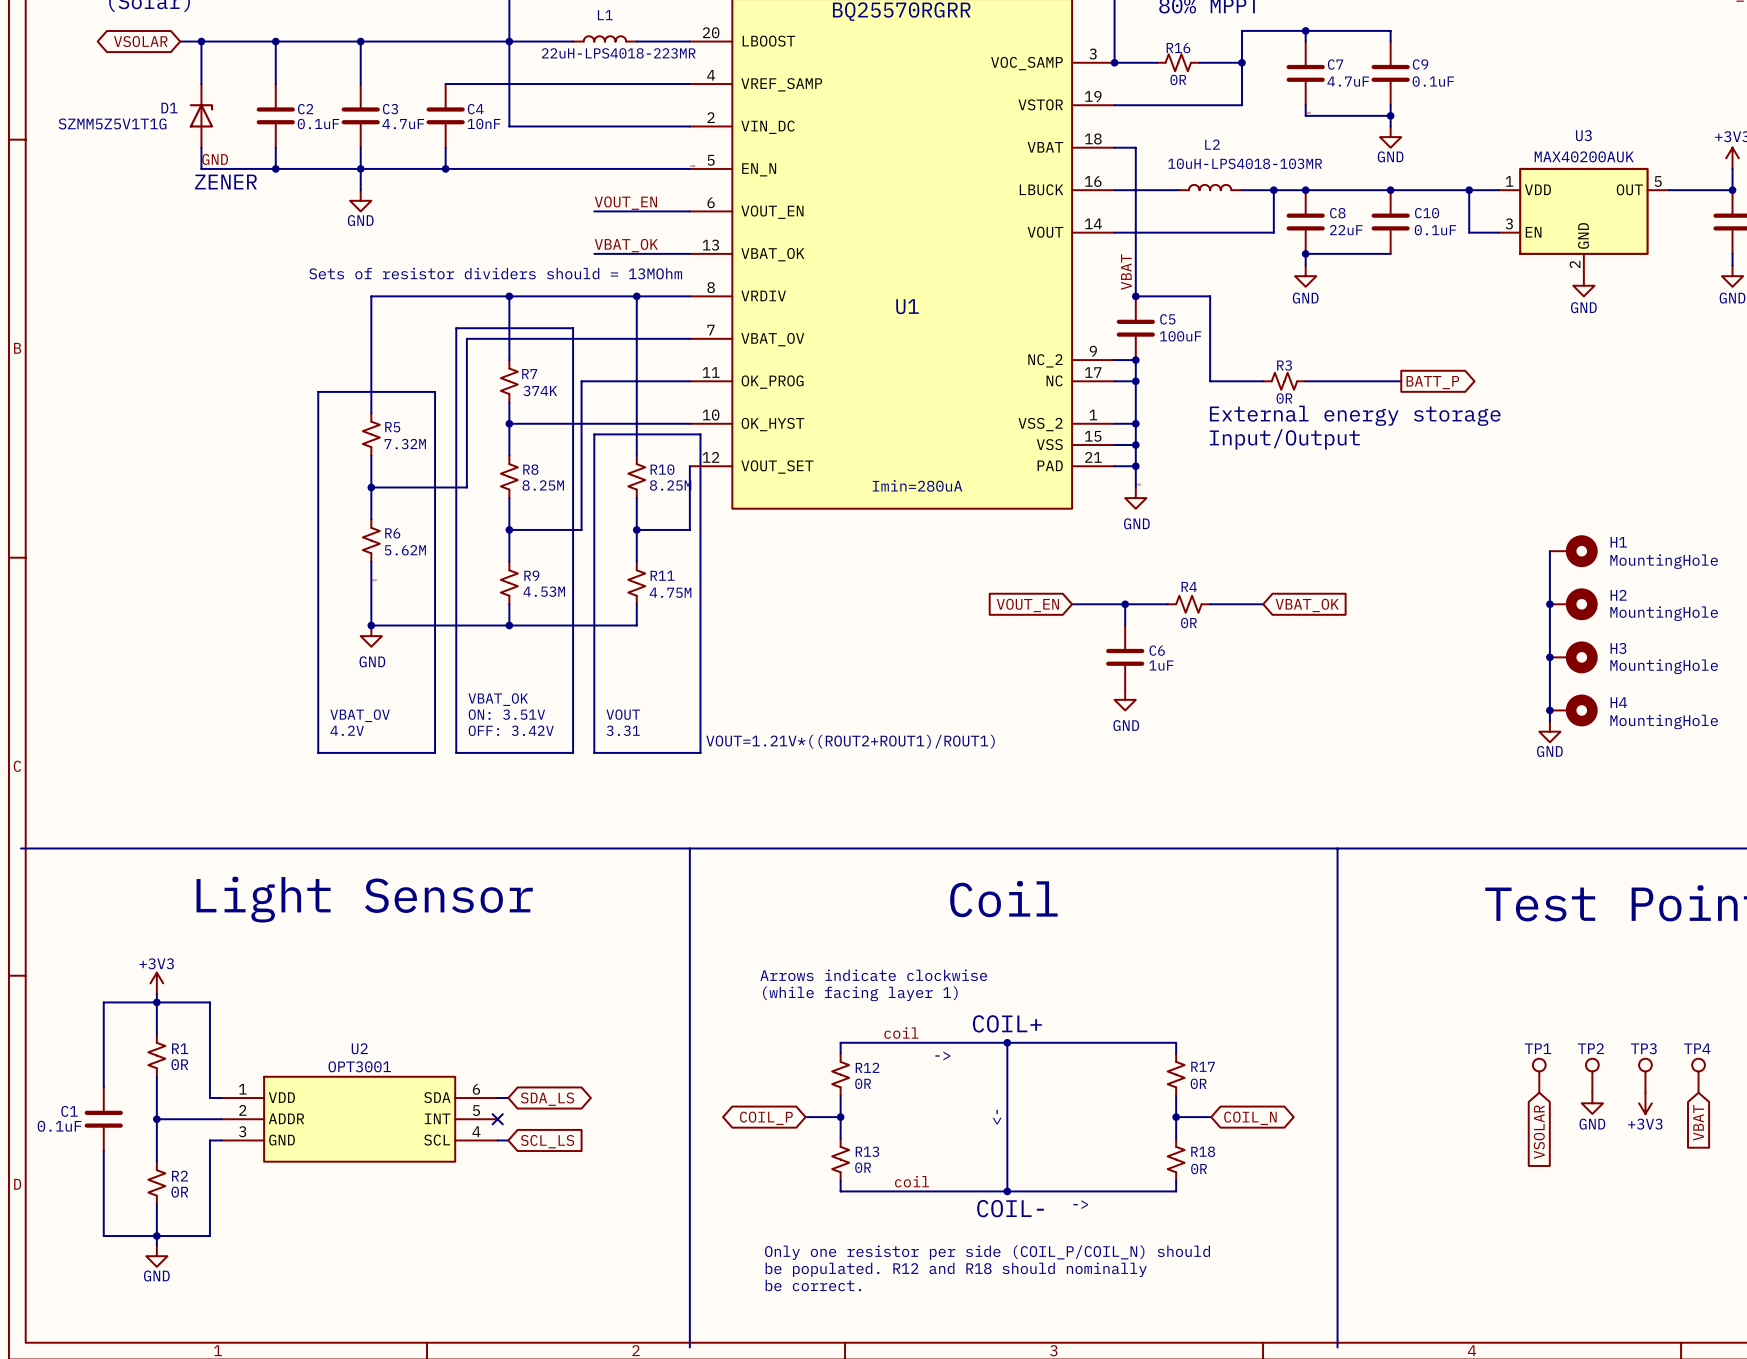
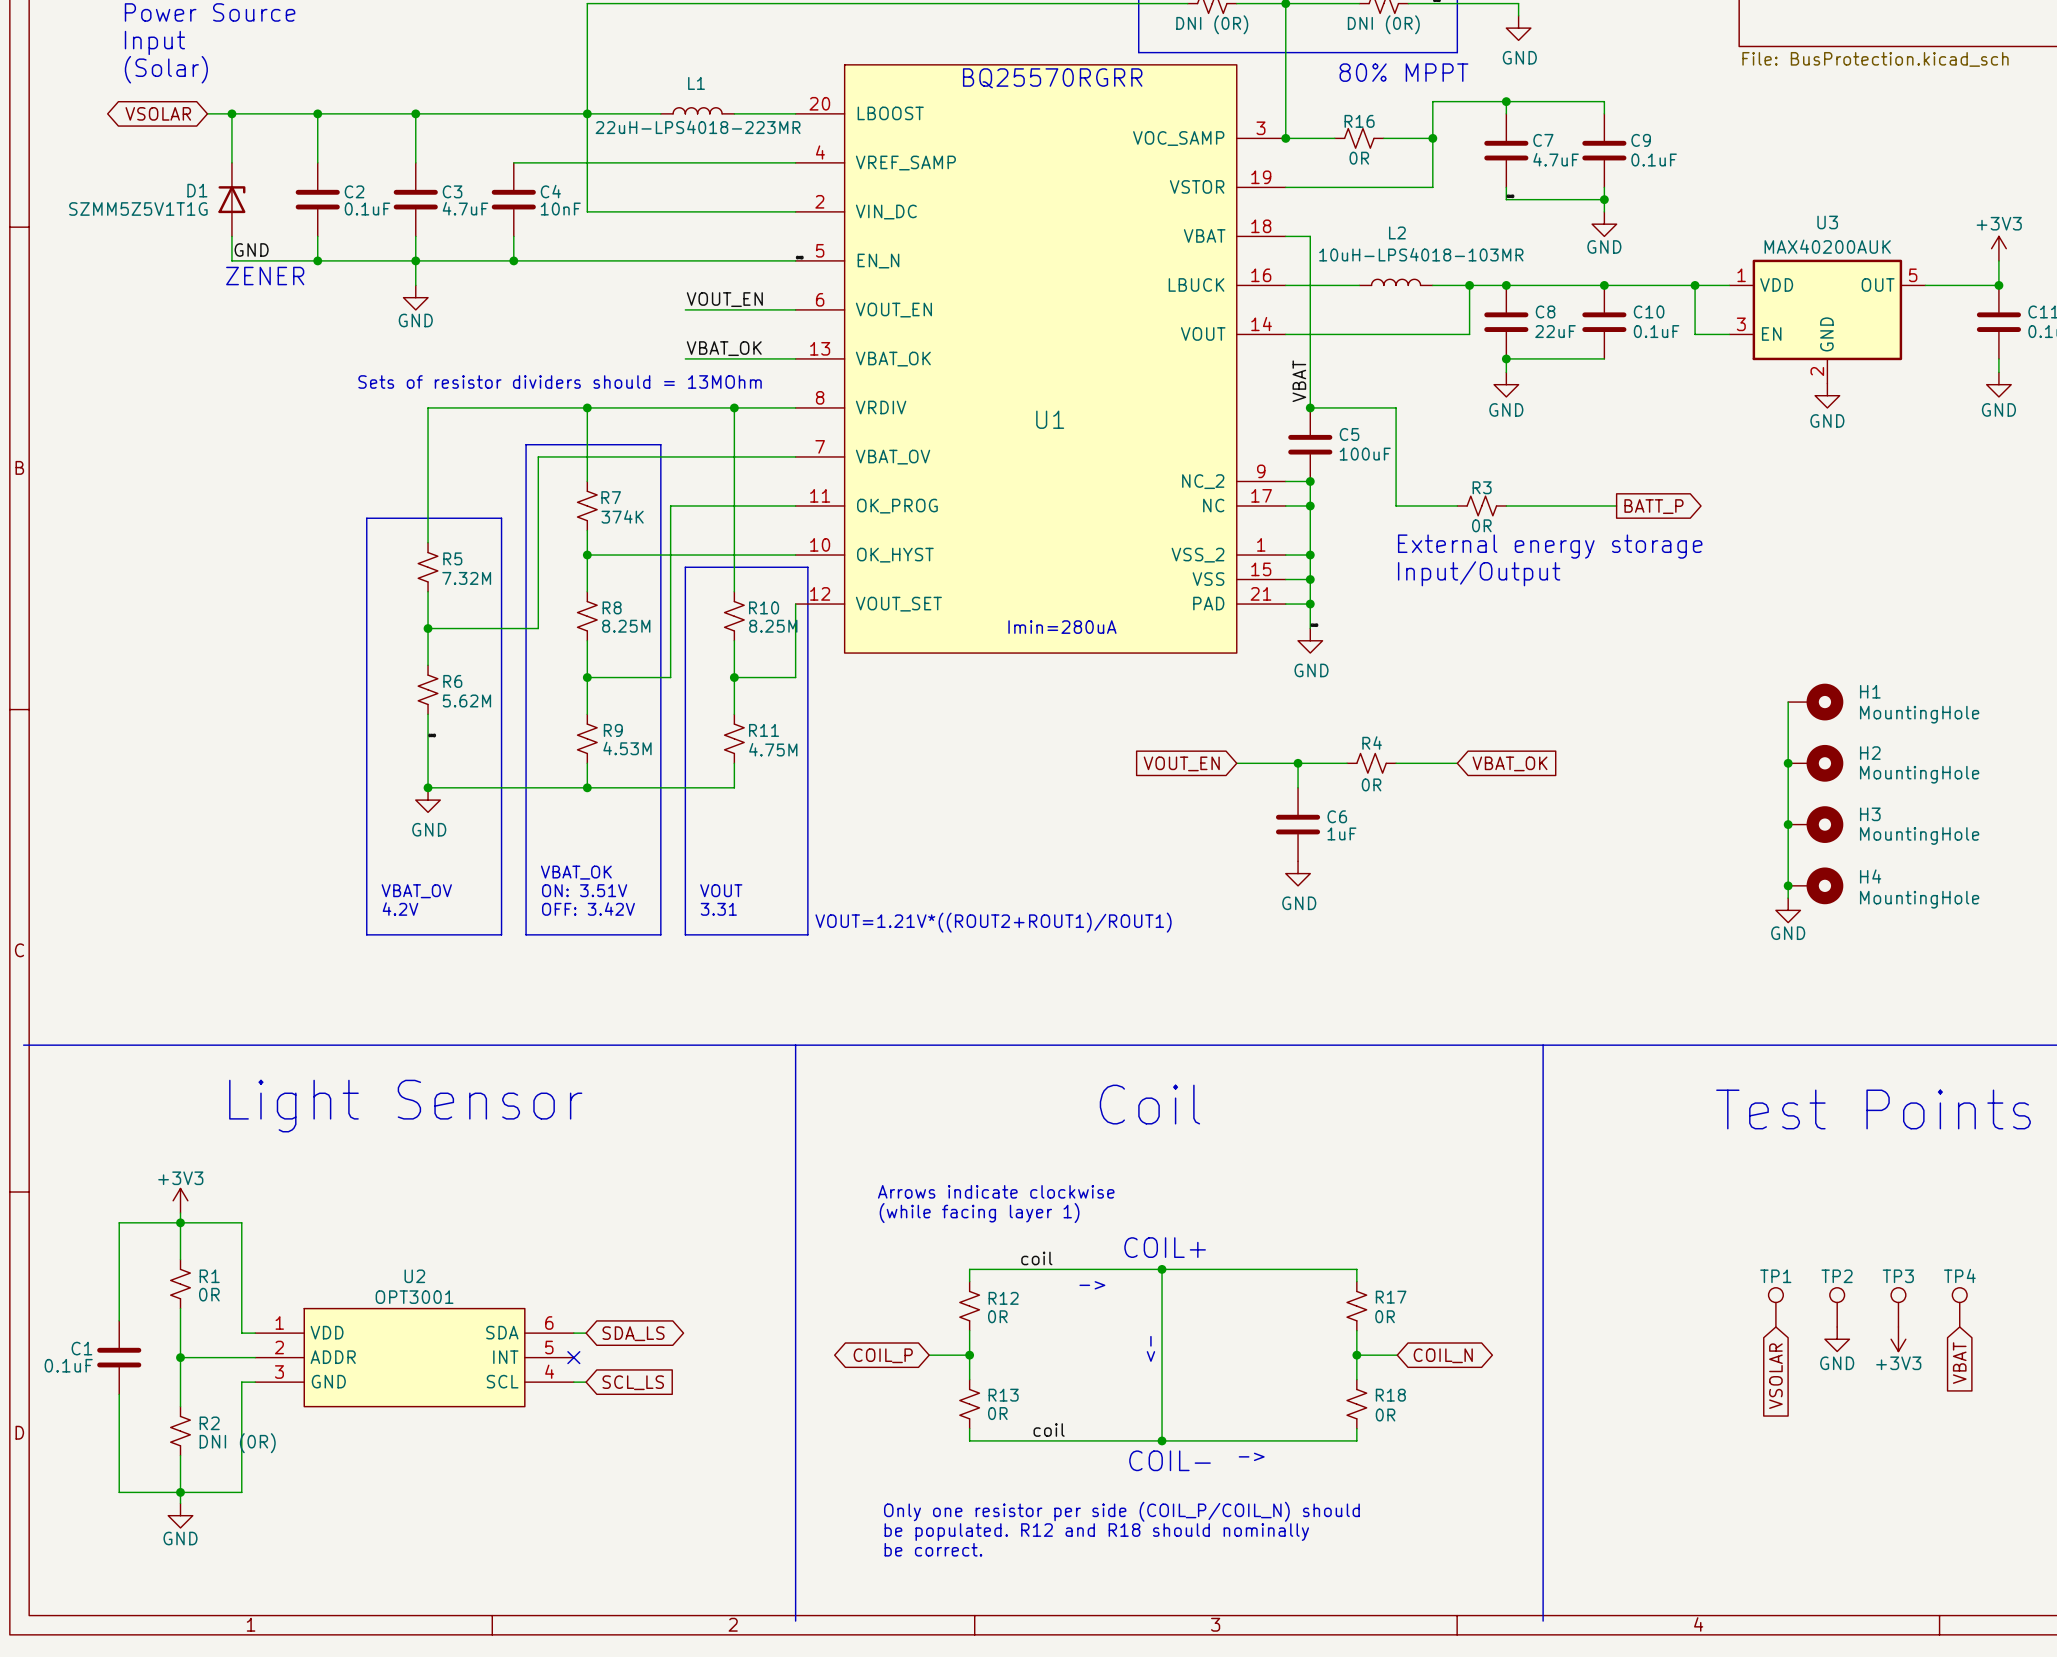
R2 value: 0R (179, 1192) -> DNI (0R) (237, 1443)

